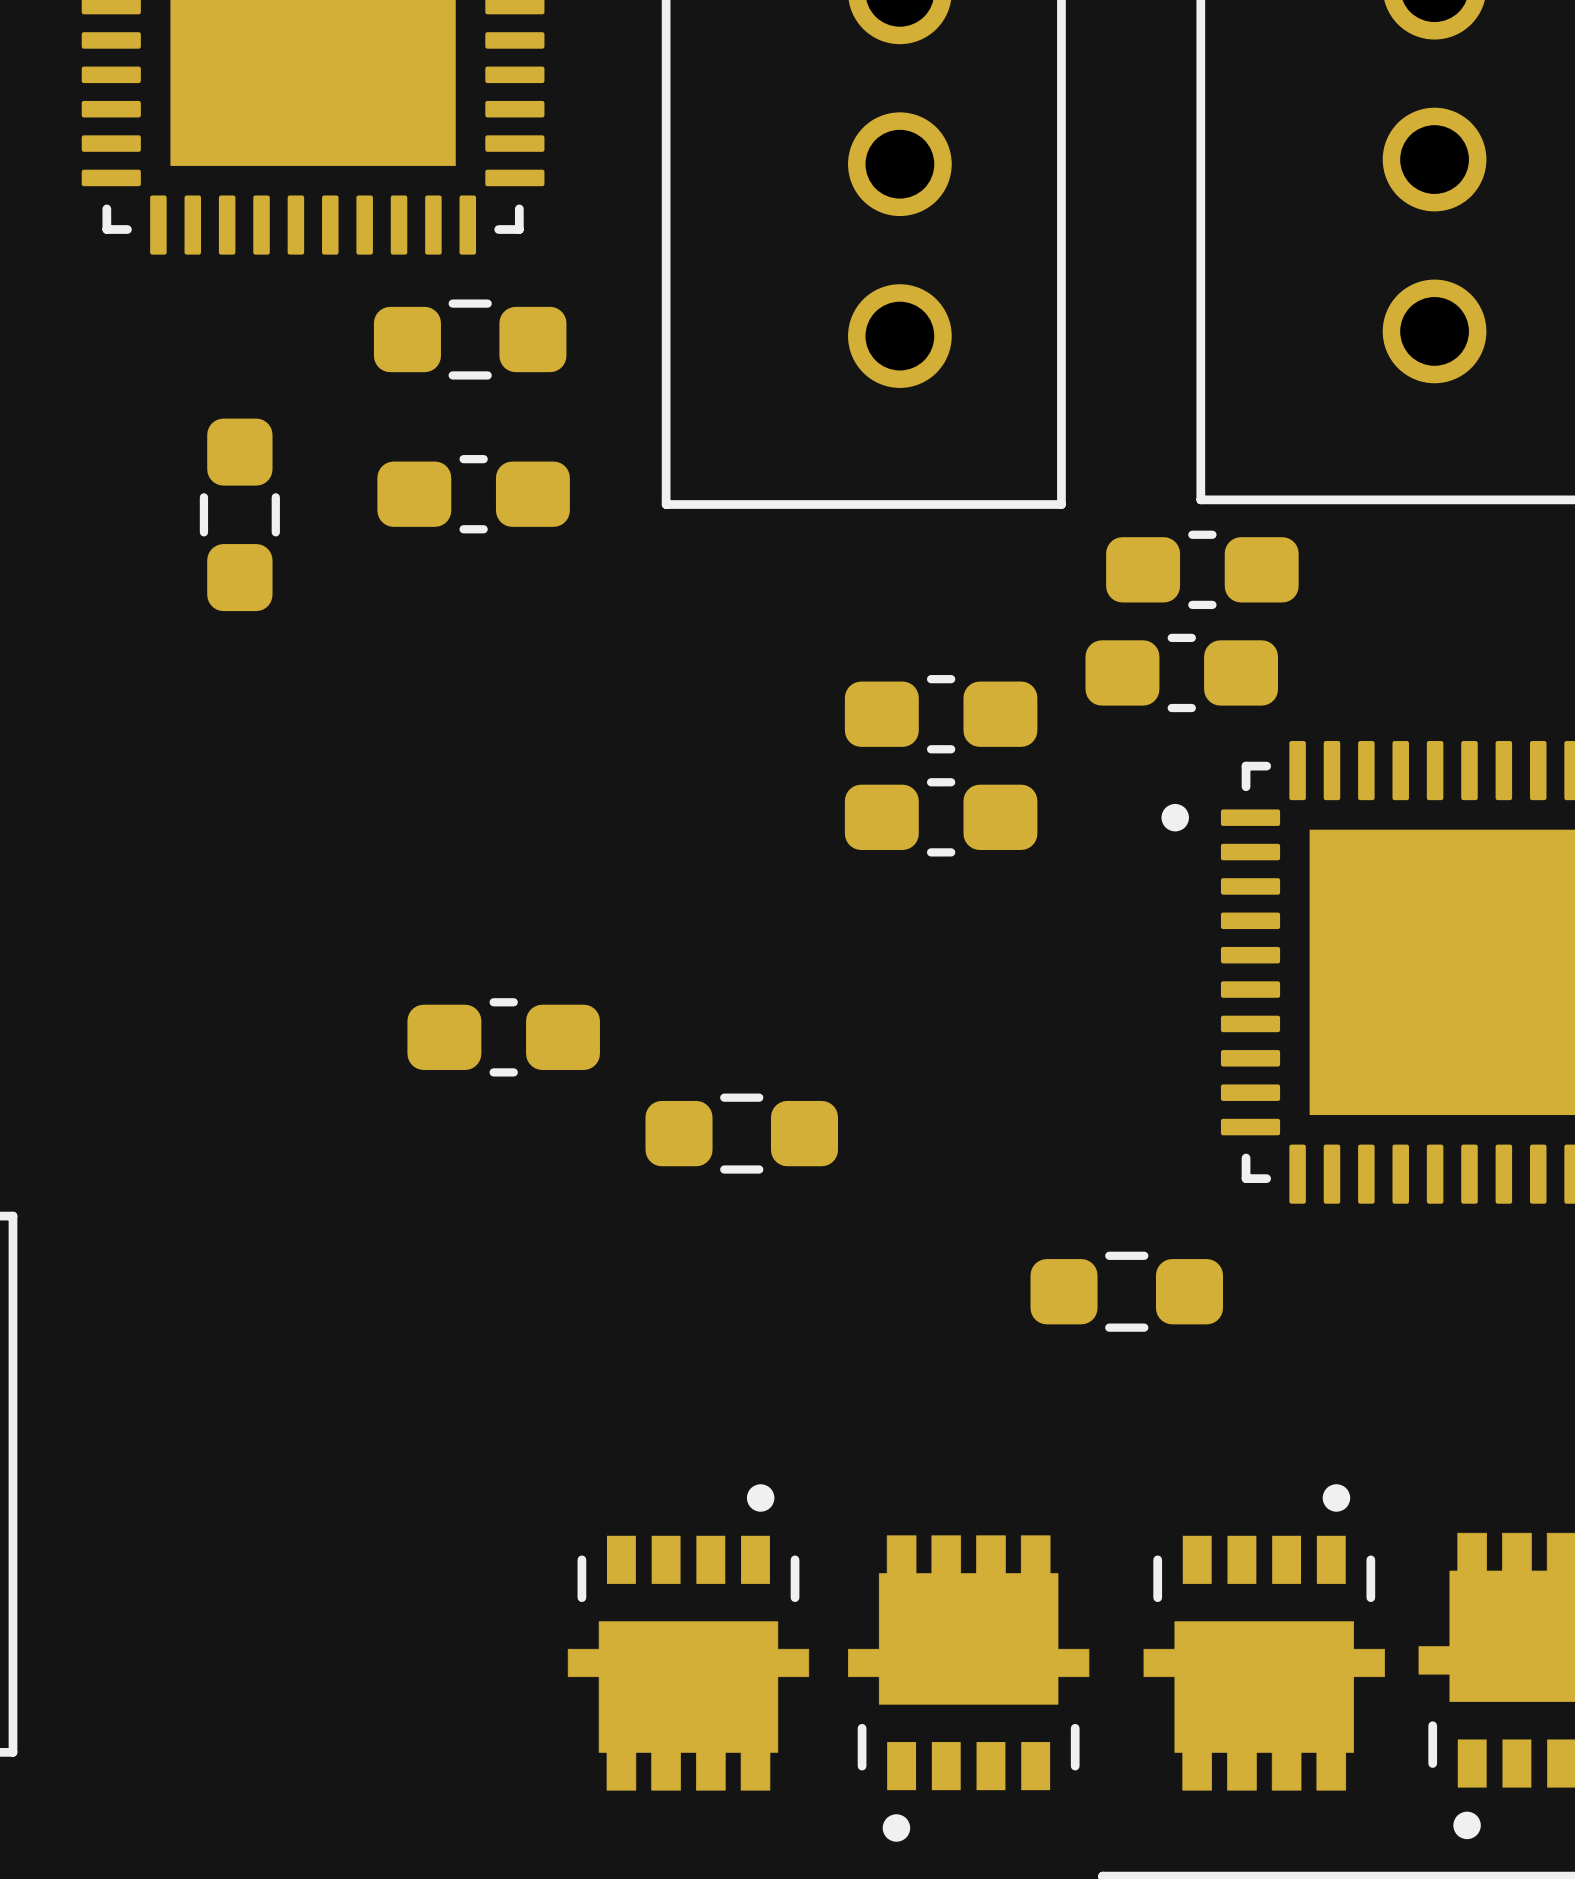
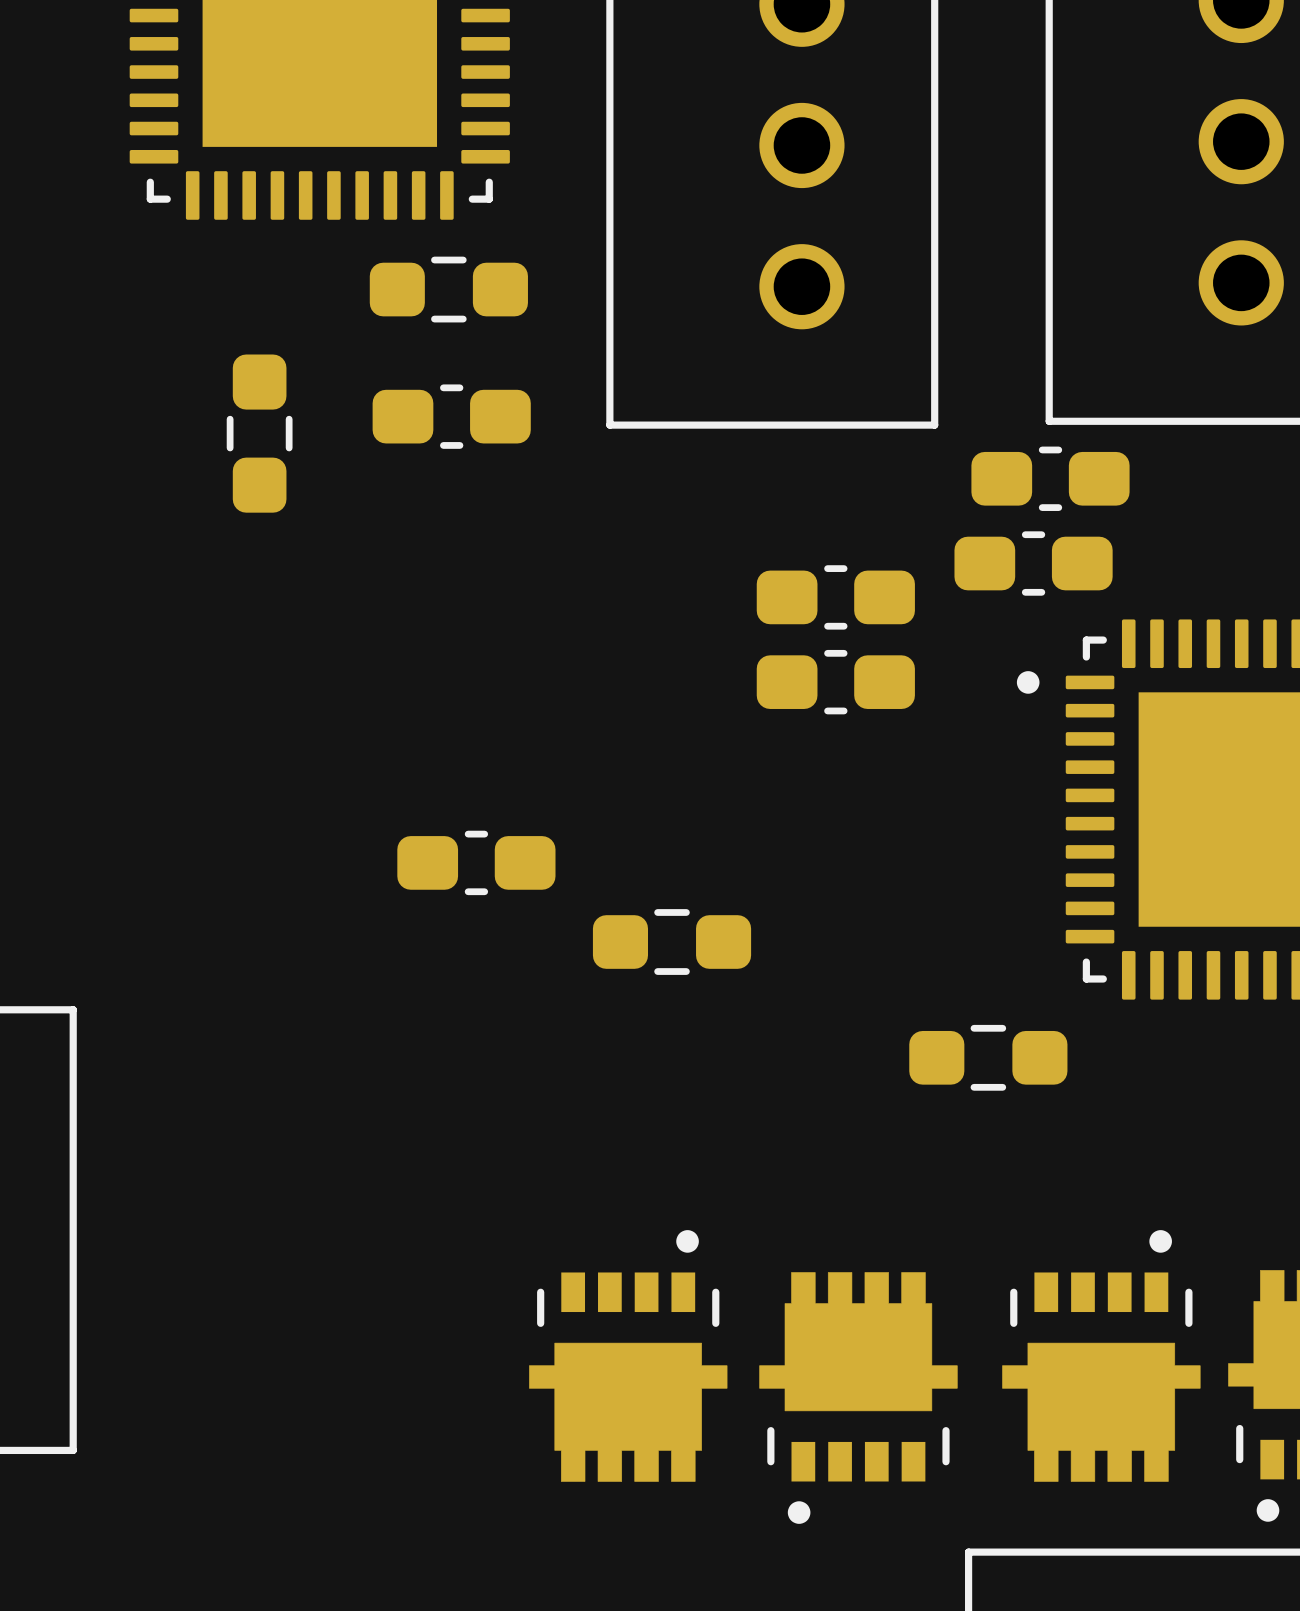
part position: (1126, 1291) -> (988, 1057)

